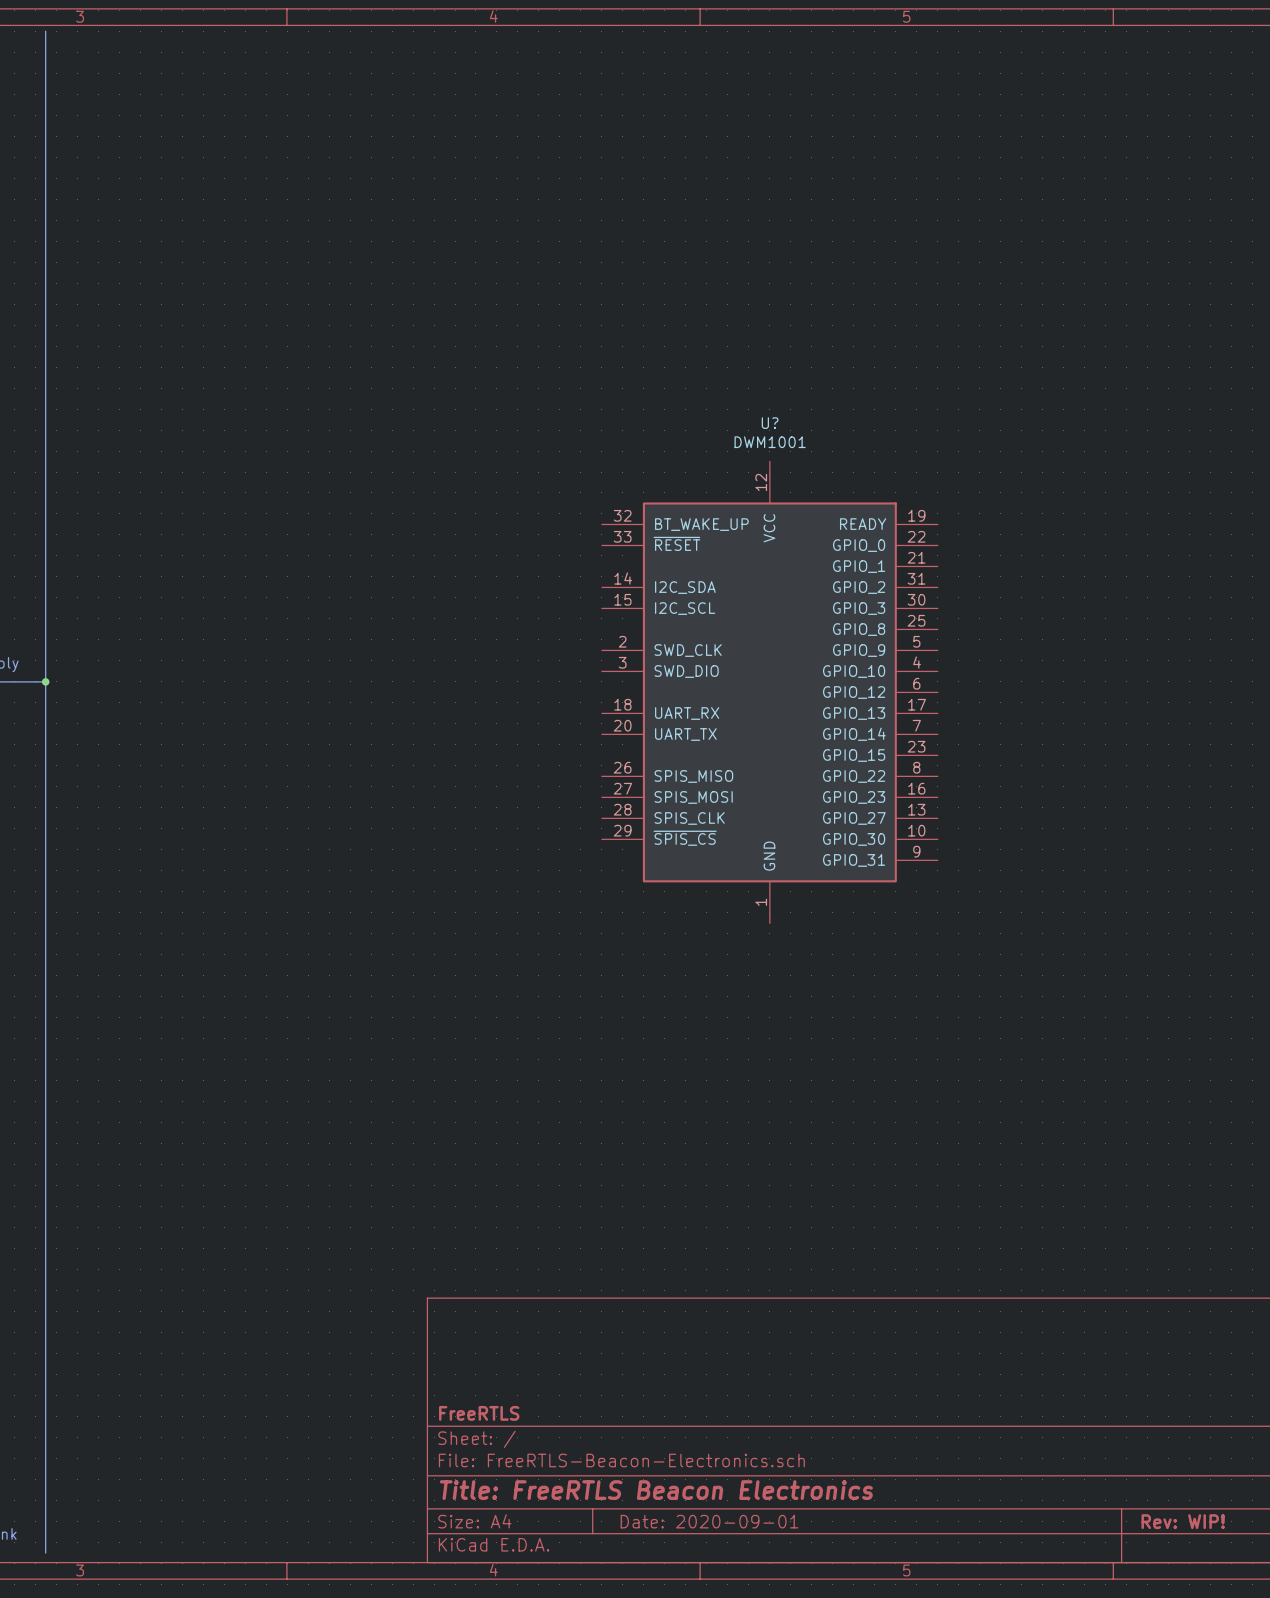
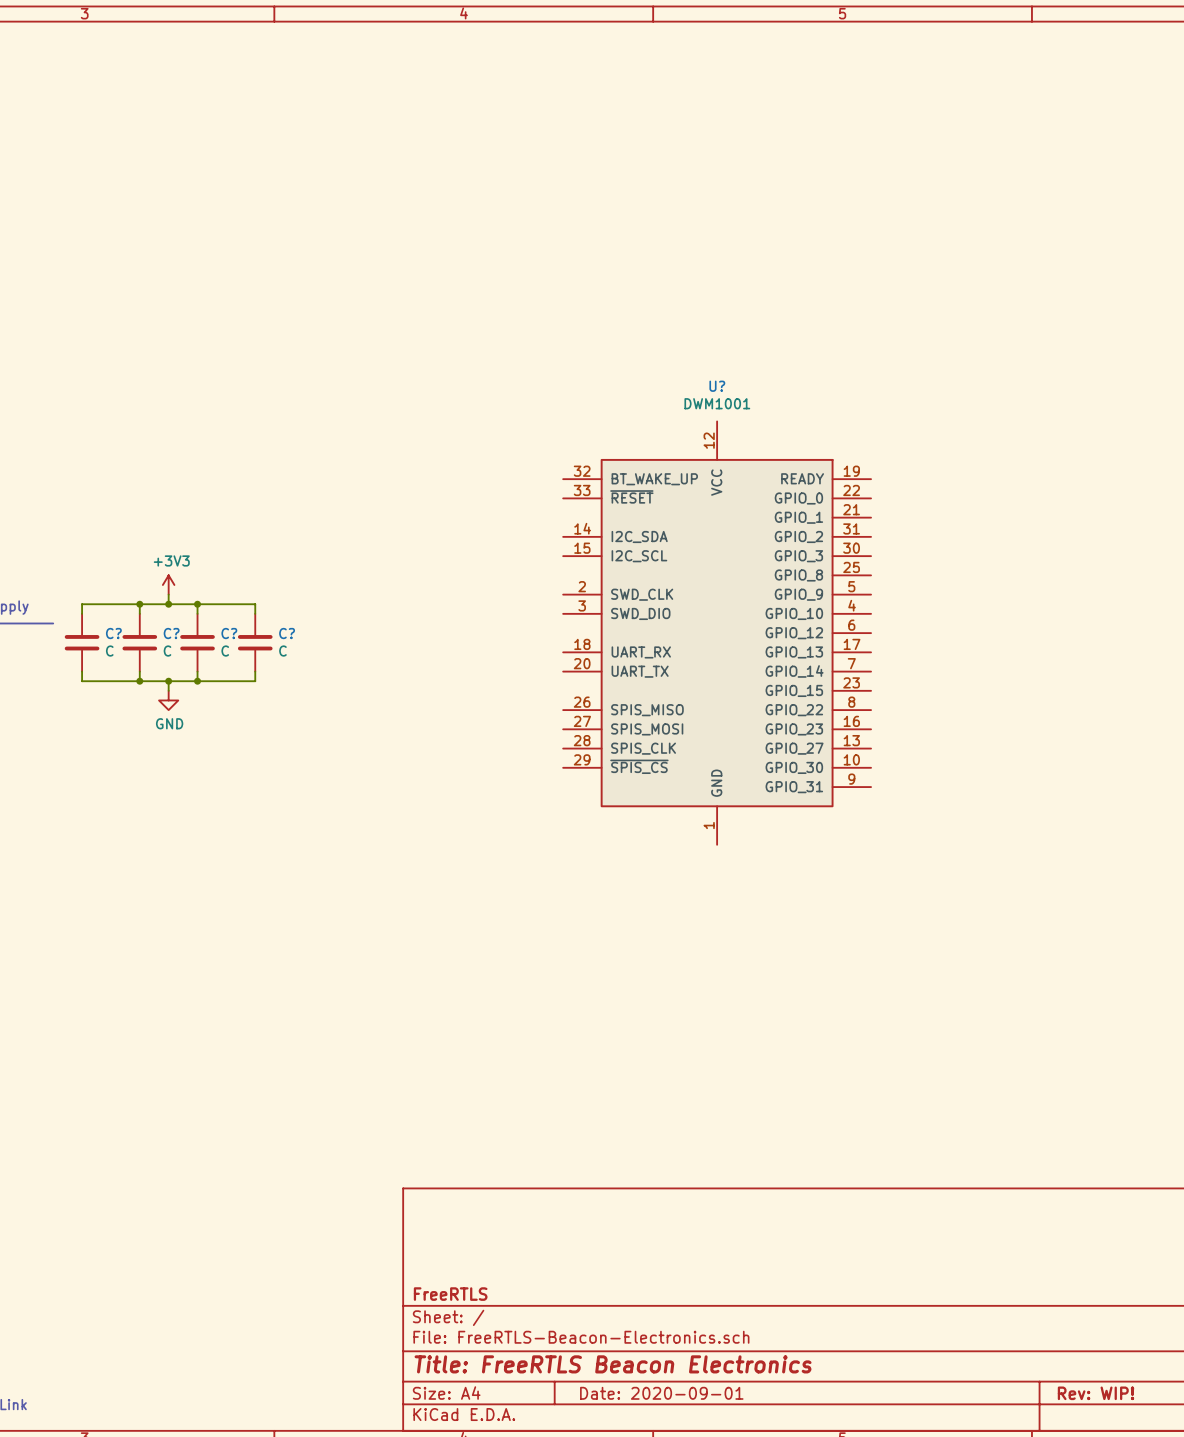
bus: (45, 31) (45, 1553) -> none
power symbol: none -> +3V3 (168, 584)
wire: none -> (168, 594) (168, 604)
wire: none -> (139, 604) (139, 613)
junction: none -> (139, 604)
junction: none -> (168, 604)
wire: none -> (197, 604) (197, 613)
junction: none -> (197, 604)
wire: none -> (82, 613) (82, 604) (255, 604) (255, 613)
junction: (45, 681) -> none
C?: none -> C (82, 642)
C?: none -> C (139, 642)
C?: none -> C (197, 642)
C?: none -> C (255, 642)
wire: none -> (82, 671) (82, 681) (255, 681) (255, 671)
wire: none -> (139, 671) (139, 681)
wire: none -> (197, 671) (197, 681)
junction: none -> (139, 681)
wire: none -> (168, 681) (168, 690)
junction: none -> (168, 681)
junction: none -> (197, 681)
power symbol: none -> GND (168, 700)

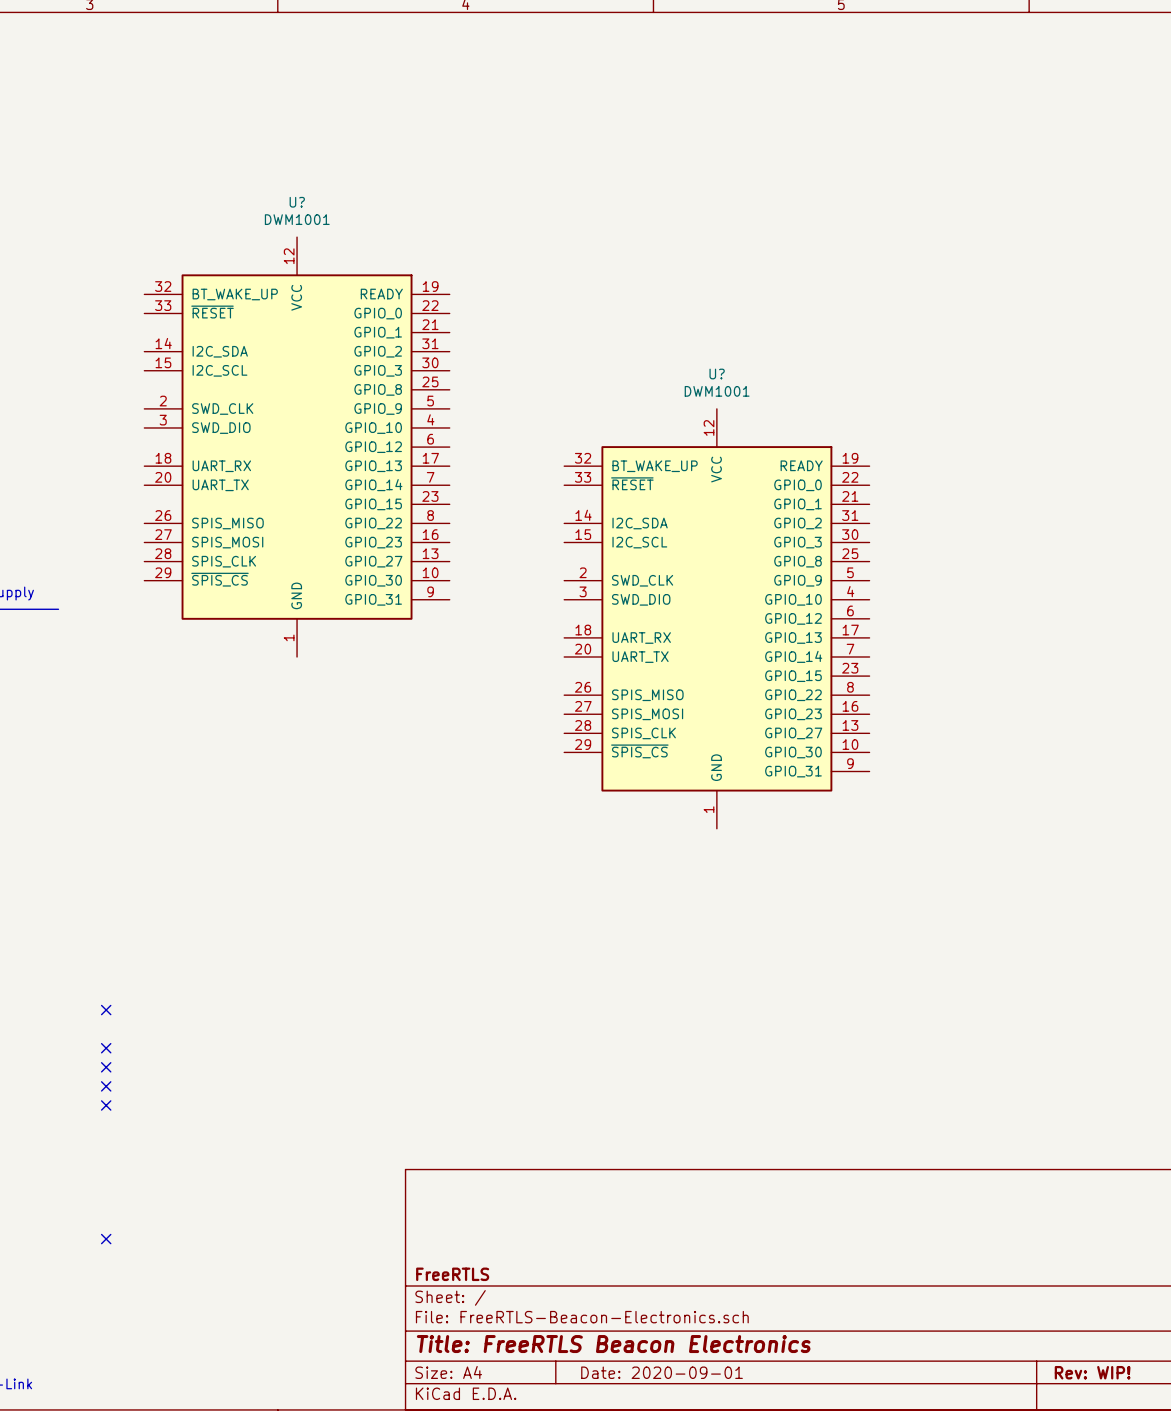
U?: none -> DWM1001 (297, 447)
power symbol: +3V3 (168, 584) -> none
wire: (168, 594) (168, 604) -> none
wire: (139, 604) (139, 613) -> none
junction: (139, 604) -> none
junction: (168, 604) -> none
junction: (197, 604) -> none
wire: (82, 613) (82, 604) (255, 604) (255, 613) -> none
C?: C (82, 642) -> none
C?: C (139, 642) -> none
C?: C (197, 642) -> none
C?: C (255, 642) -> none
wire: (82, 671) (82, 681) (255, 681) (255, 671) -> none
wire: (139, 671) (139, 681) -> none
wire: (197, 671) (197, 681) -> none
junction: (139, 681) -> none
wire: (168, 681) (168, 690) -> none
junction: (168, 681) -> none
junction: (197, 681) -> none
power symbol: GND (168, 700) -> none
no-connect mark: none -> (106, 1010)
no-connect mark: none -> (106, 1048)
no-connect mark: none -> (106, 1067)
no-connect mark: none -> (106, 1086)
no-connect mark: none -> (106, 1105)
no-connect mark: none -> (106, 1239)

